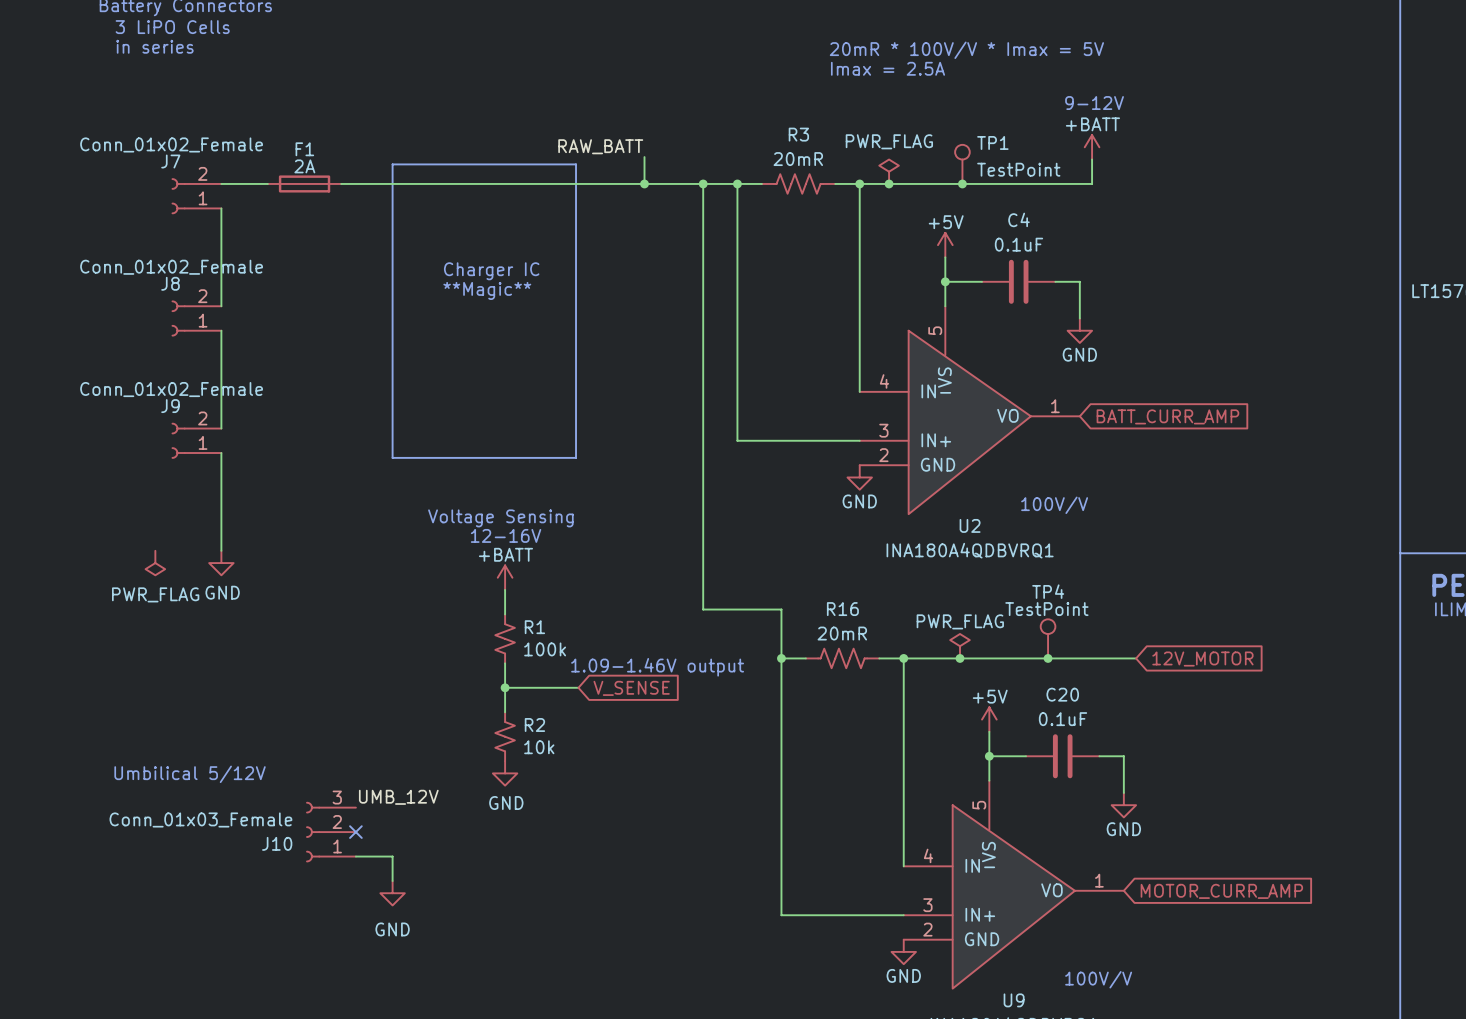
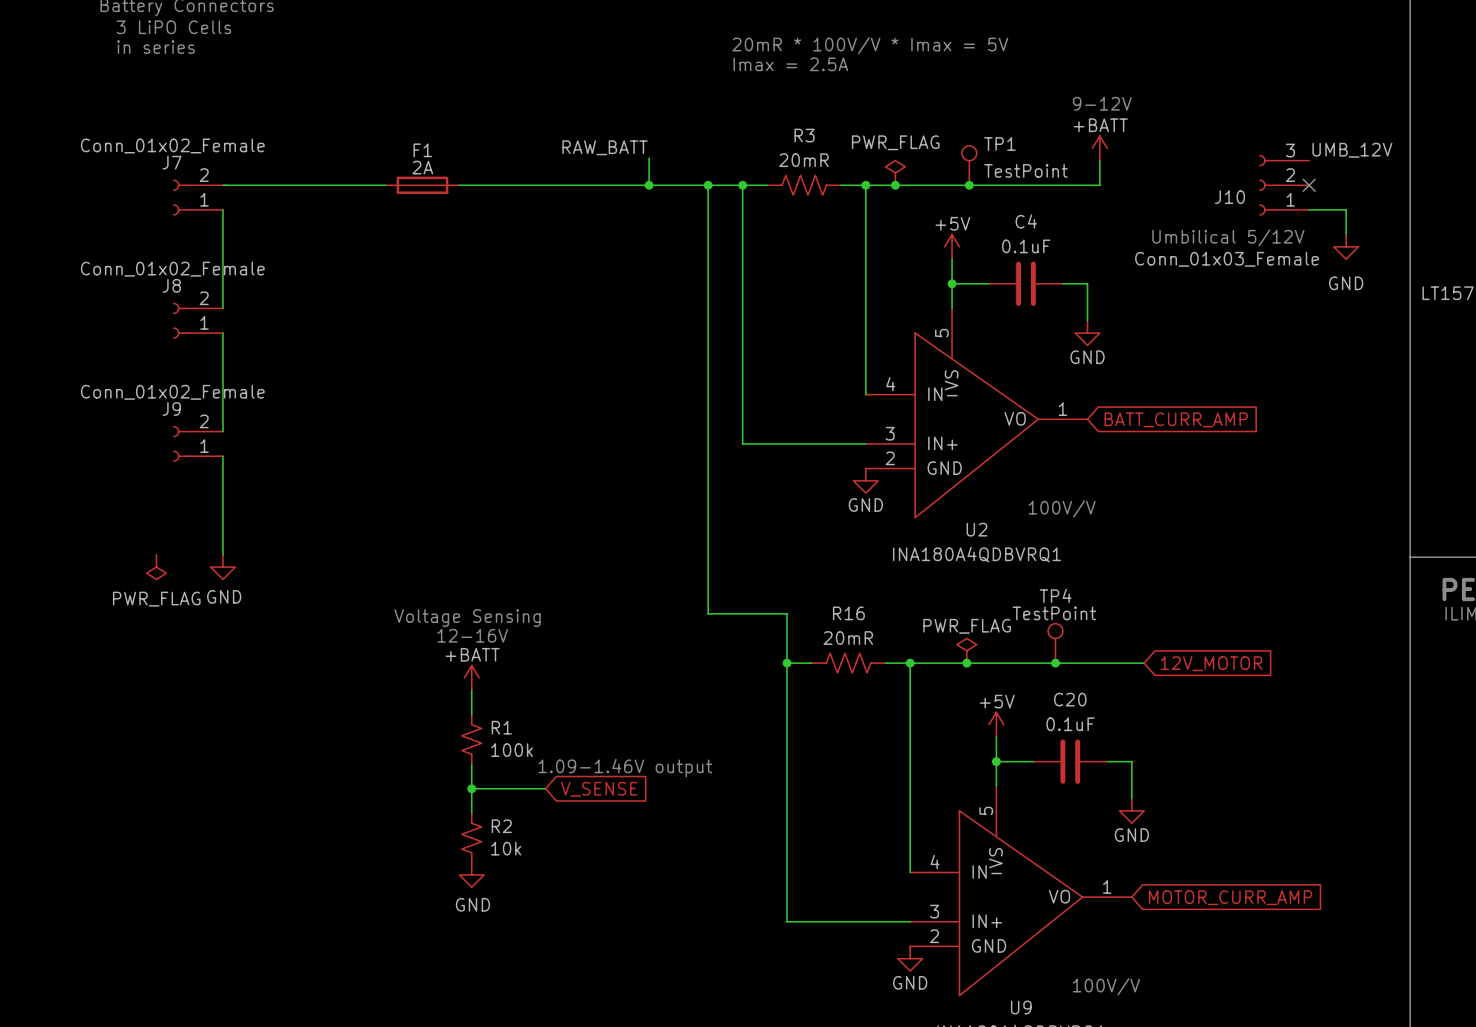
text position: 20mR * 100V/V * Imax = 5V (966, 50) -> 20mR * 100V/V * Imax = 5V (870, 45)
text position: Imax = 2.5A (888, 68) -> Imax = 2.5A (790, 64)
label: none -> UMB_12V (1352, 150)
line: (392, 164) (392, 457) (576, 457) (576, 164) (392, 164) -> none
F1 position: (304, 183) -> (422, 185)
no-connect mark: none -> (1309, 185)
wire: none -> (1309, 209) (1346, 209) (1346, 234)
text: none -> Umbilical 5/12V (1228, 237)
power symbol: none -> GND (1346, 246)
text: Charger IC (491, 271) -> none
text: **Magic** (487, 290) -> none
text position: Voltage Sensing (500, 518) -> Voltage Sensing (467, 618)
text position: 12-16V (506, 535) -> 12-16V (472, 635)
power symbol position: +BATT (505, 577) -> +BATT (471, 677)
wire: (505, 589) (505, 614) -> (471, 690) (471, 714)
R1 position: (505, 638) -> (471, 739)
wire: (505, 663) (505, 712) -> (471, 764) (471, 813)
text position: 1.09-1.46V output (657, 667) -> 1.09-1.46V output (625, 768)
wire: (505, 687) (578, 687) -> (471, 788) (545, 788)
junction: (505, 687) -> none
global label position: V_SENSE (631, 688) -> V_SENSE (599, 789)
R2 position: (505, 736) -> (471, 838)
power symbol: GND (505, 773) -> none
text: Umbilical 5/12V (190, 774) -> none
junction: none -> (471, 788)
label: UMB_12V (398, 797) -> none
J10 value position: Conn_01x03_Female (200, 819) -> Conn_01x03_Female (1227, 259)
J10 position: (331, 832) -> (1284, 185)
no-connect mark: (355, 832) -> none
wire: (355, 856) (392, 856) (392, 881) -> none
power symbol: none -> GND (471, 874)
power symbol: GND (392, 893) -> none

